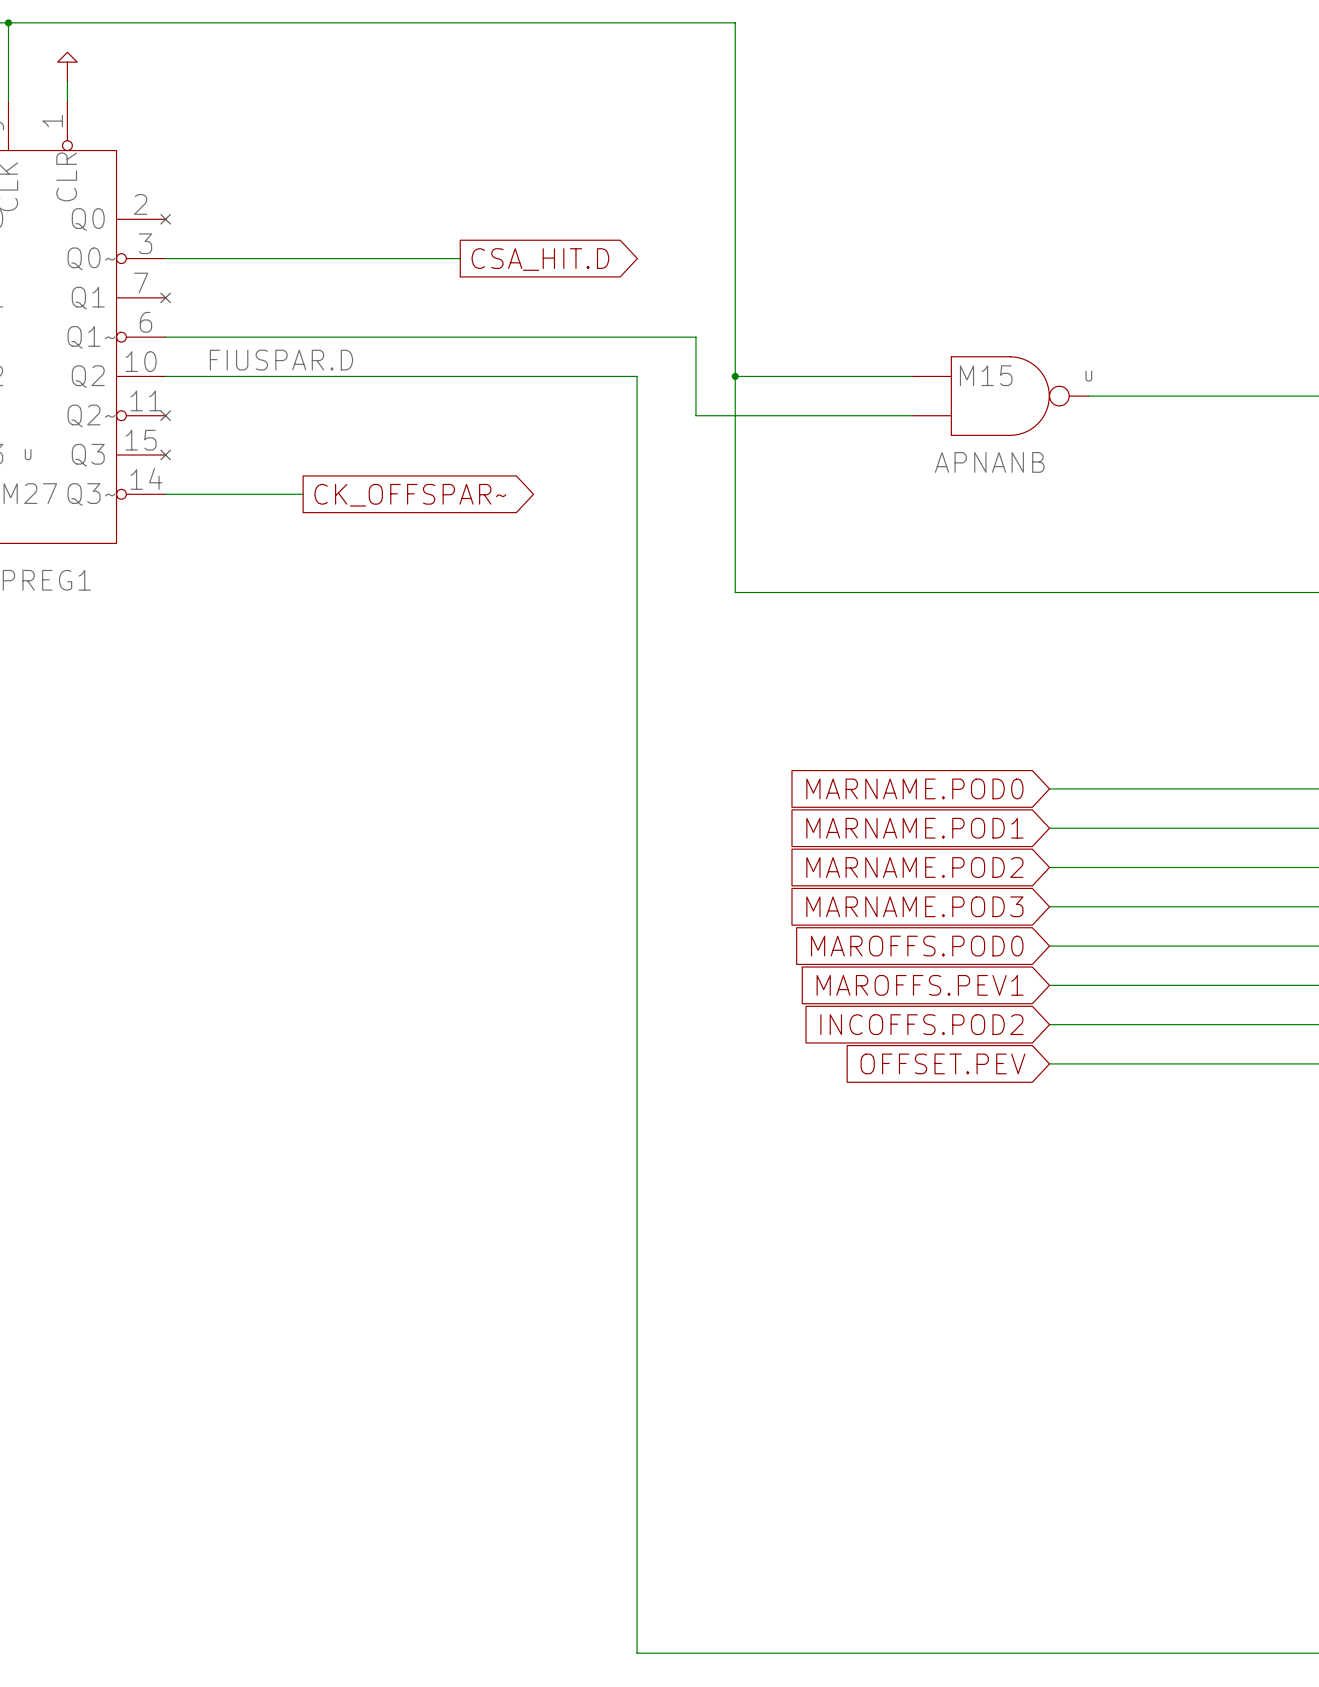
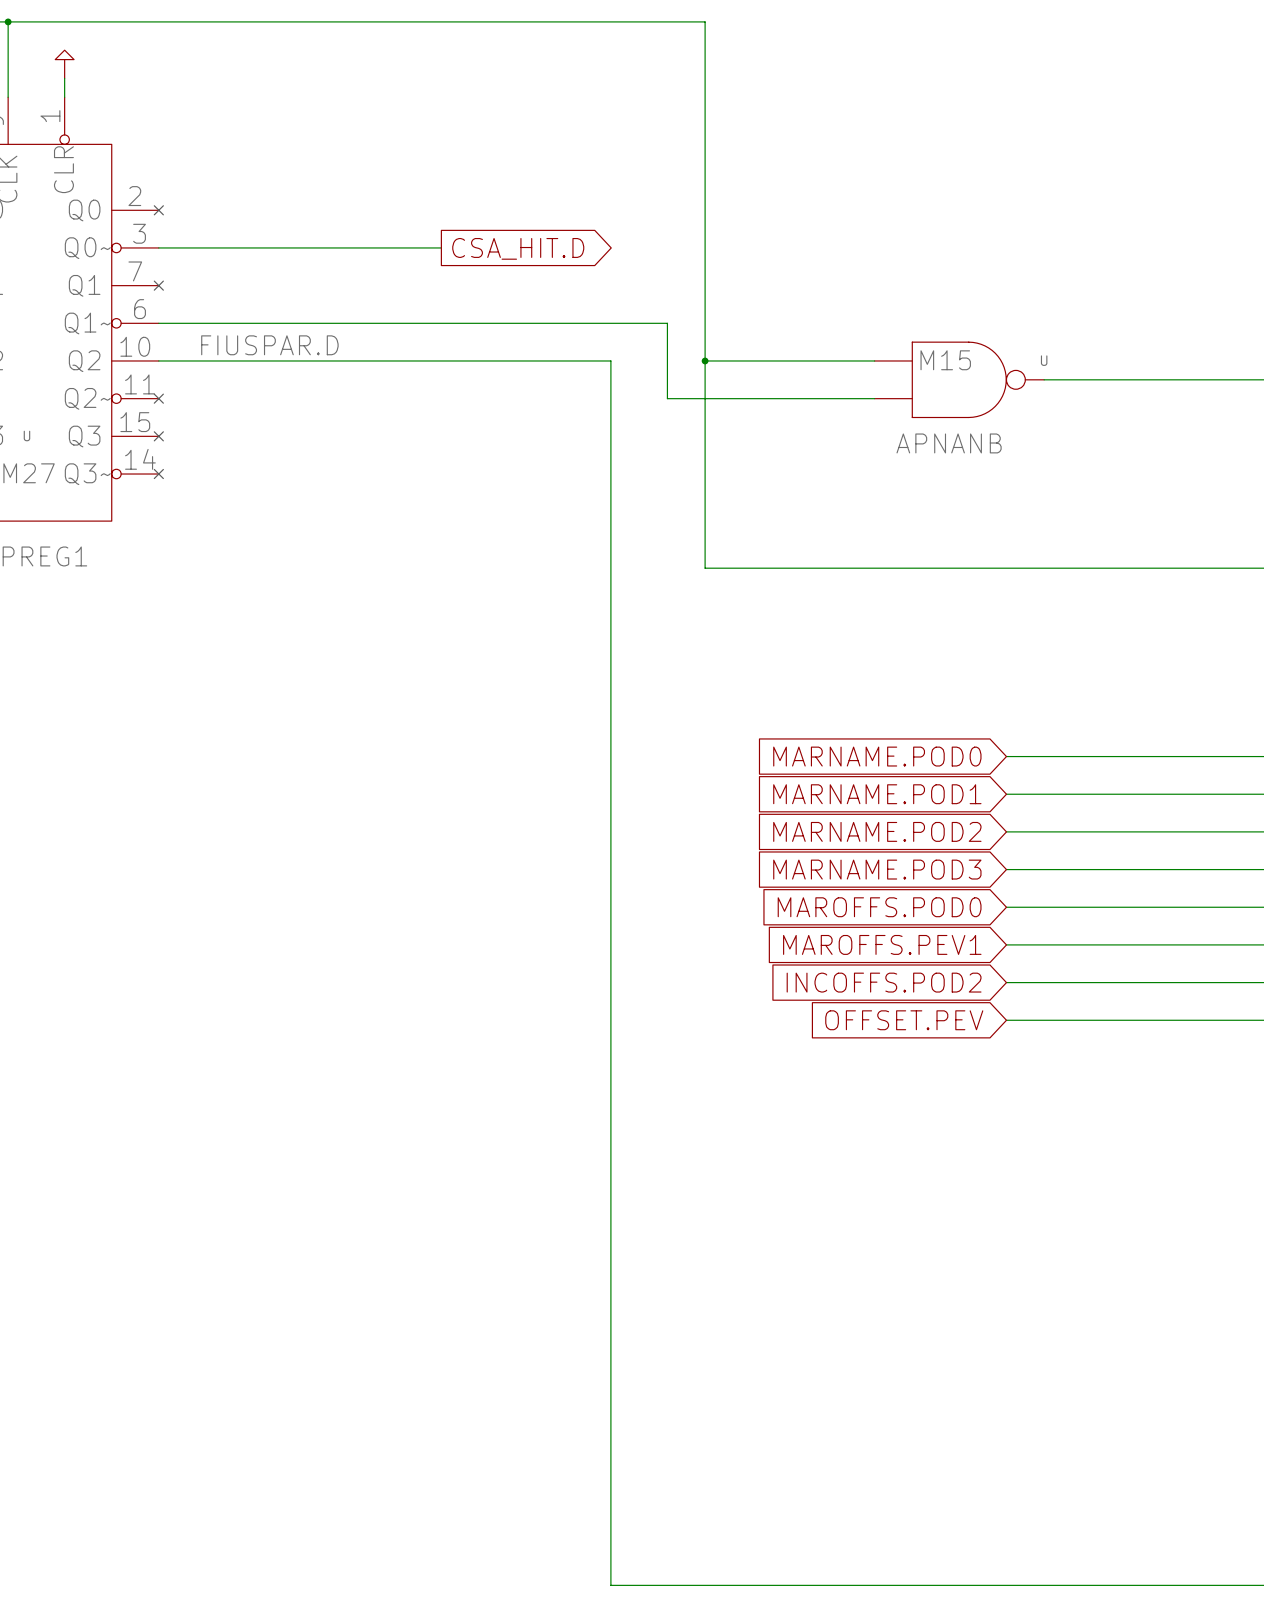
wire: (165, 494) (303, 494) -> none
no-connect mark: none -> (158, 474)
global label: CK_OFFSPAR~ (410, 495) -> none

